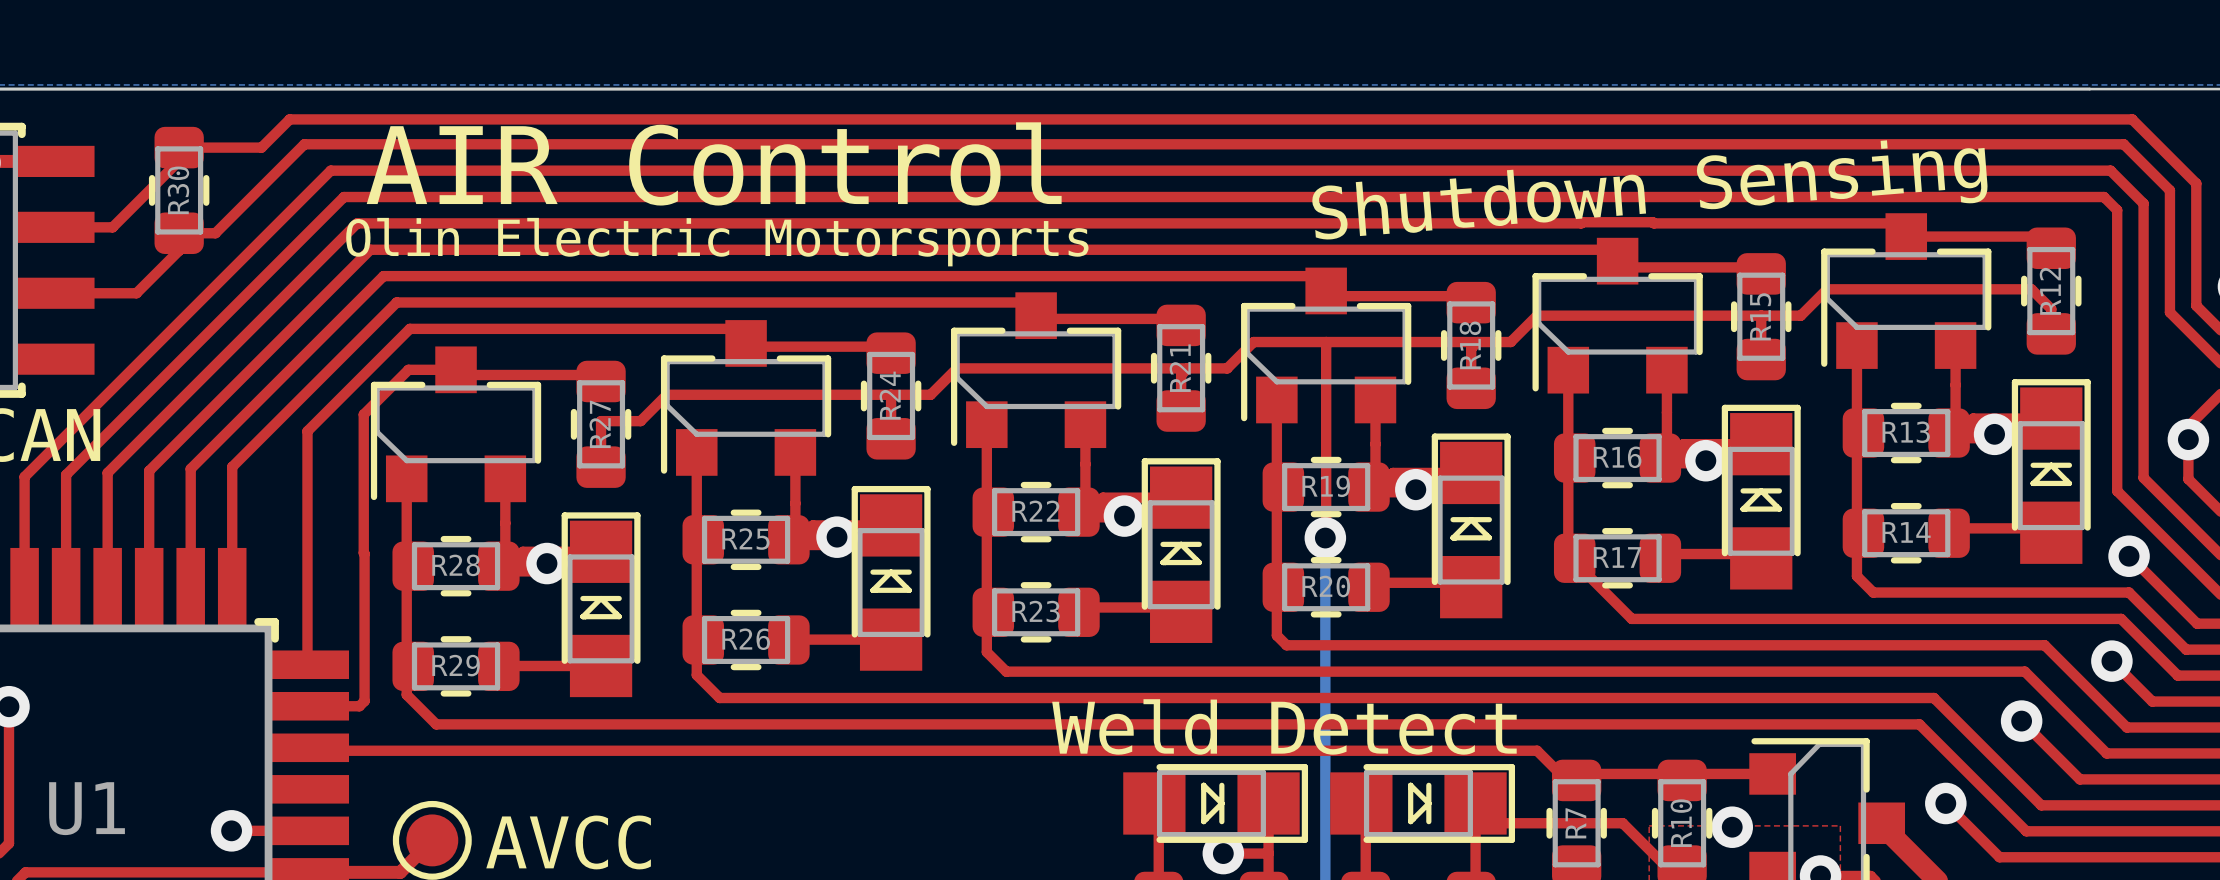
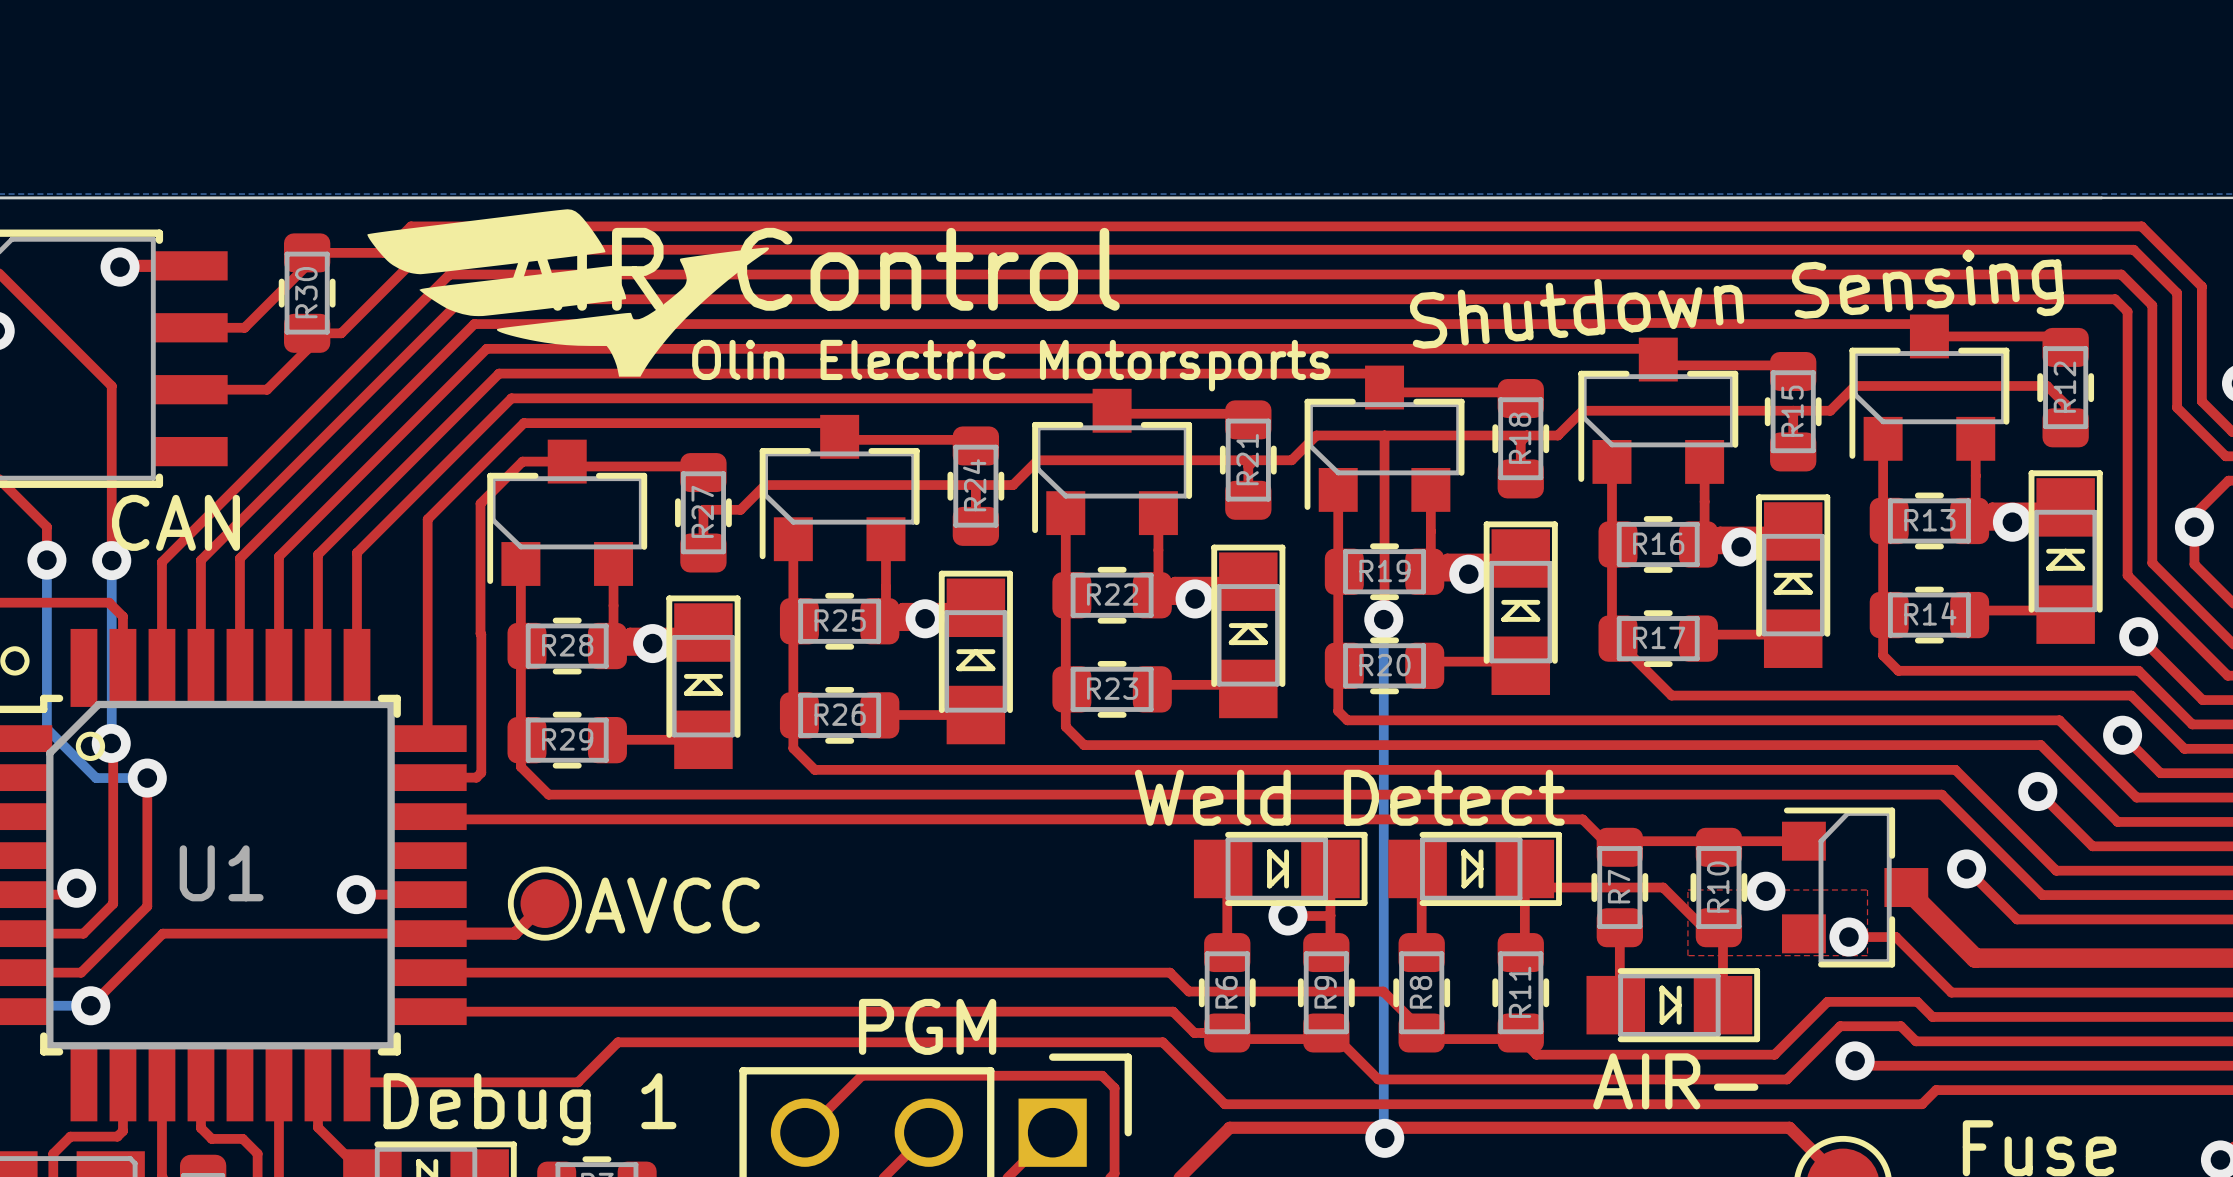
drawing: none -> [367, 209, 769, 377]
text position: Shutdown Sensing (1649, 189) -> Shutdown Sensing (1737, 299)
text position: Olin Electric Motorsports (717, 242) -> Olin Electric Motorsports (1011, 365)

